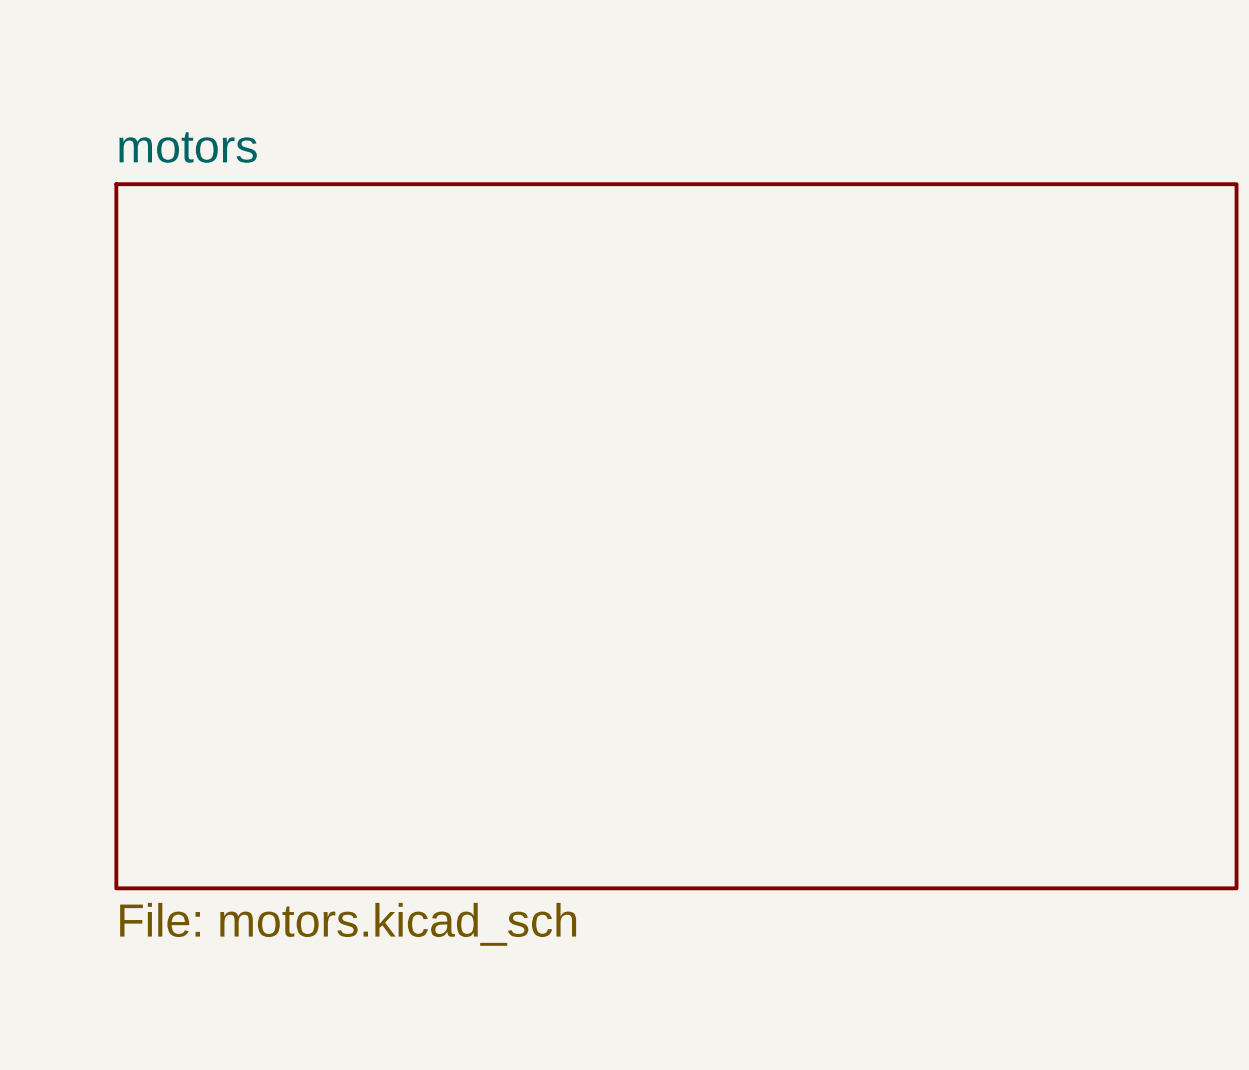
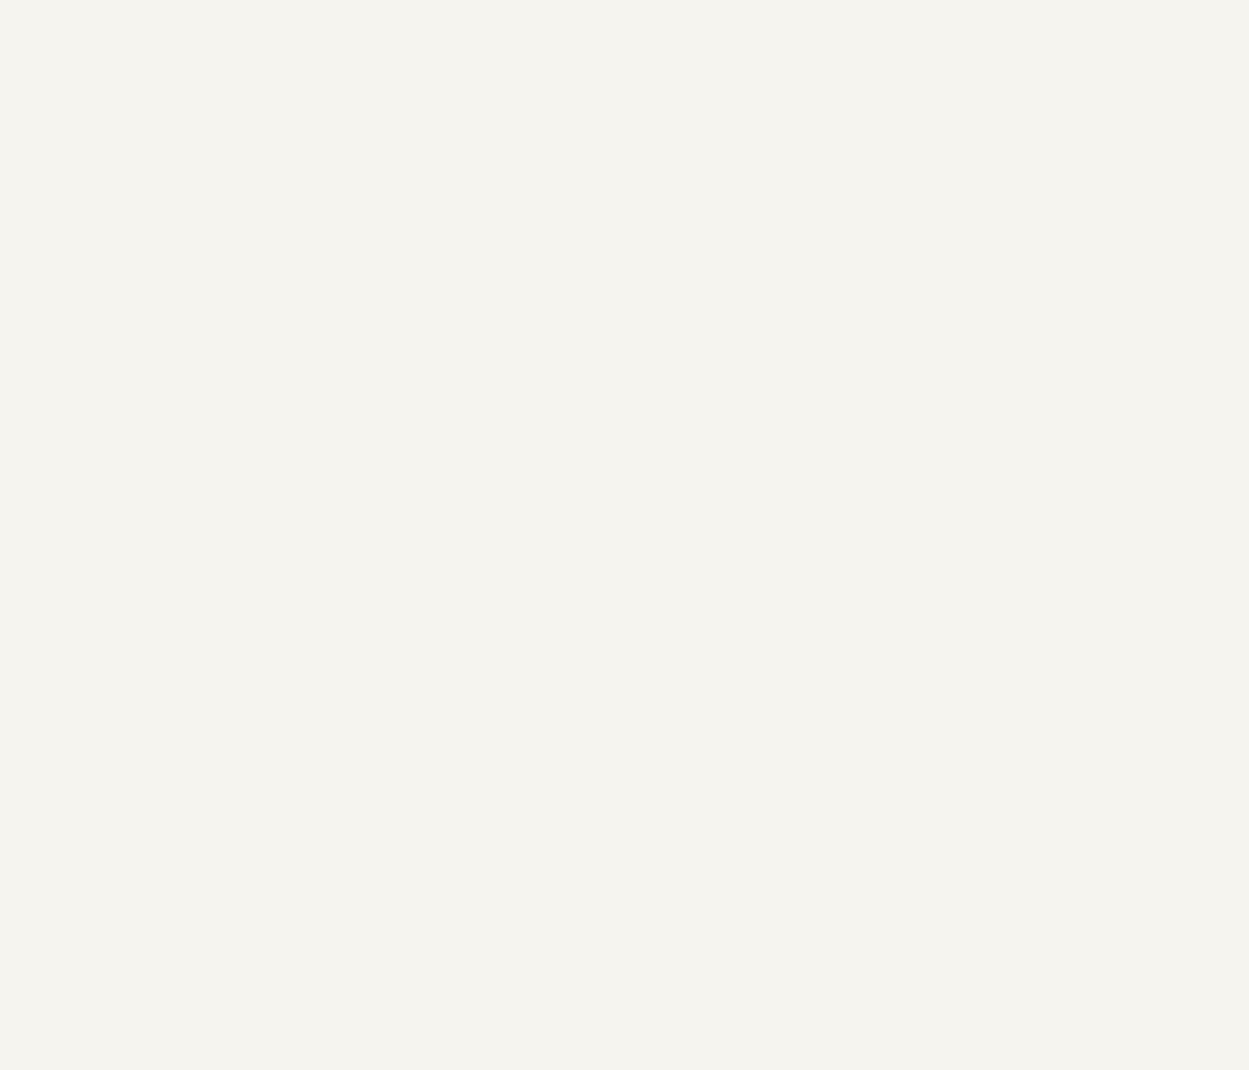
sheet motors: File: motors.kicad_sch (676, 536) -> none

